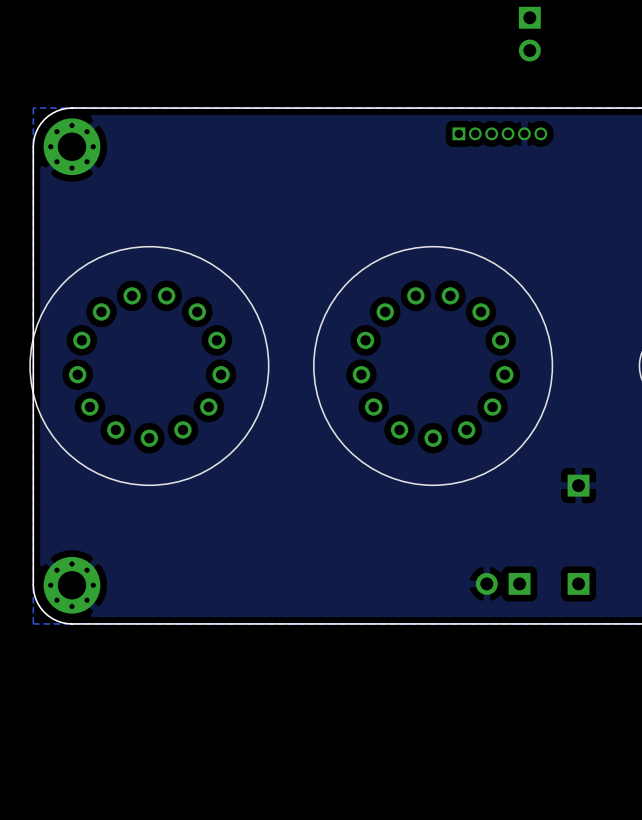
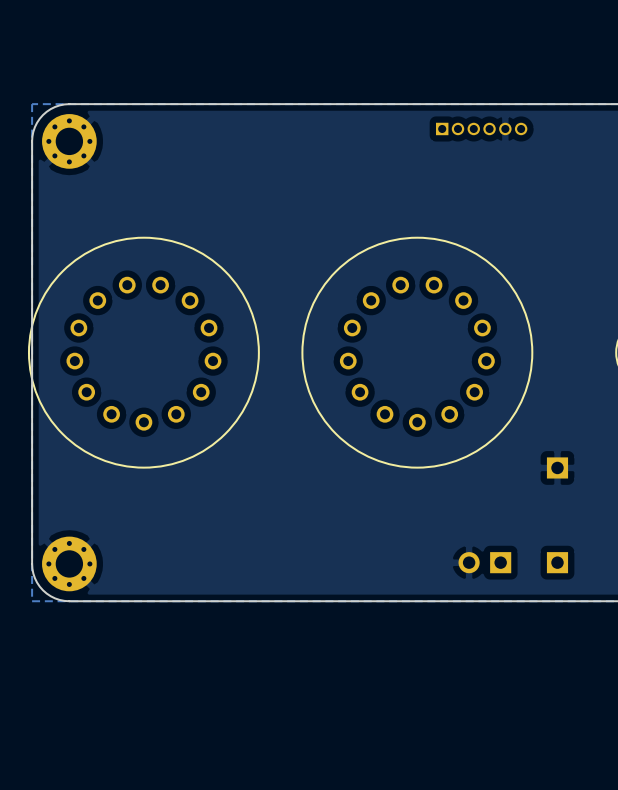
part: (529, 34) -> none

